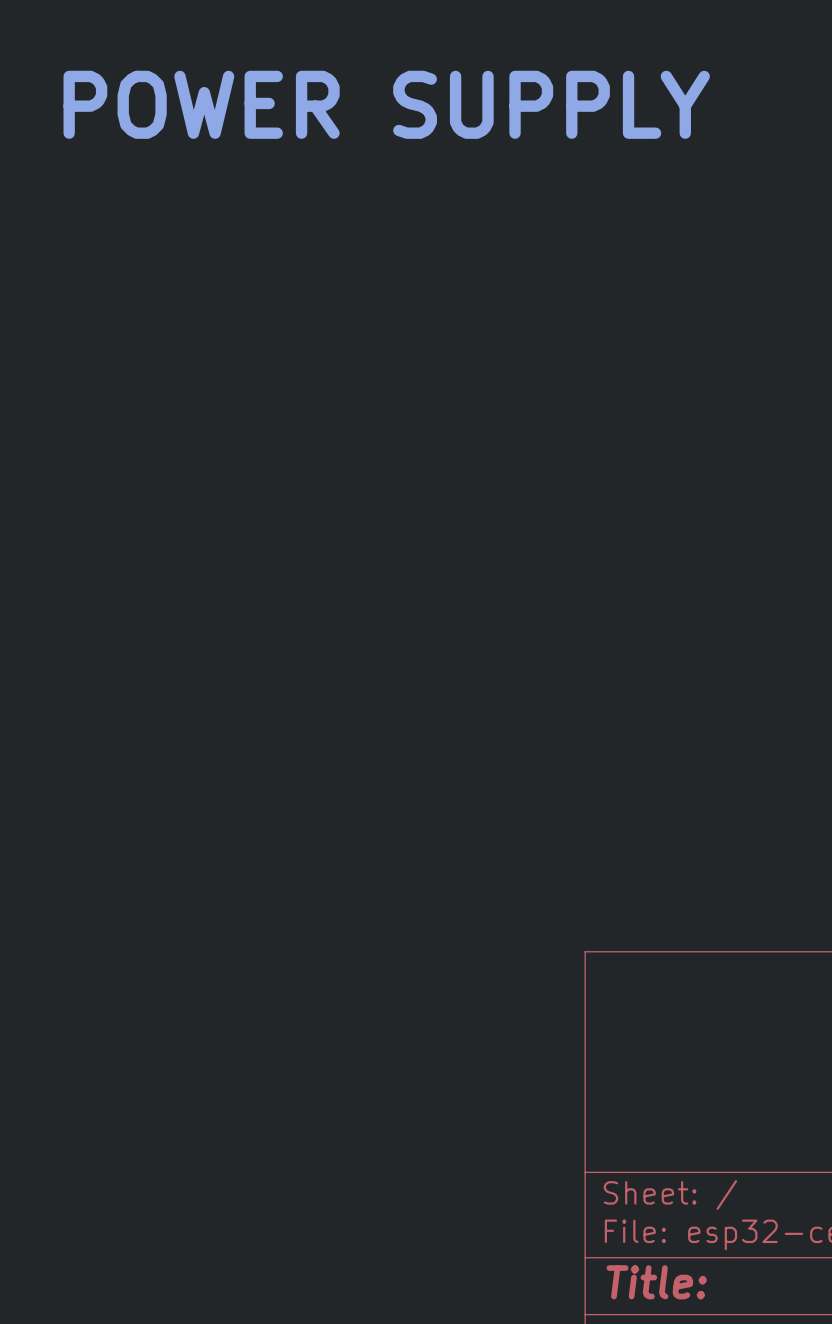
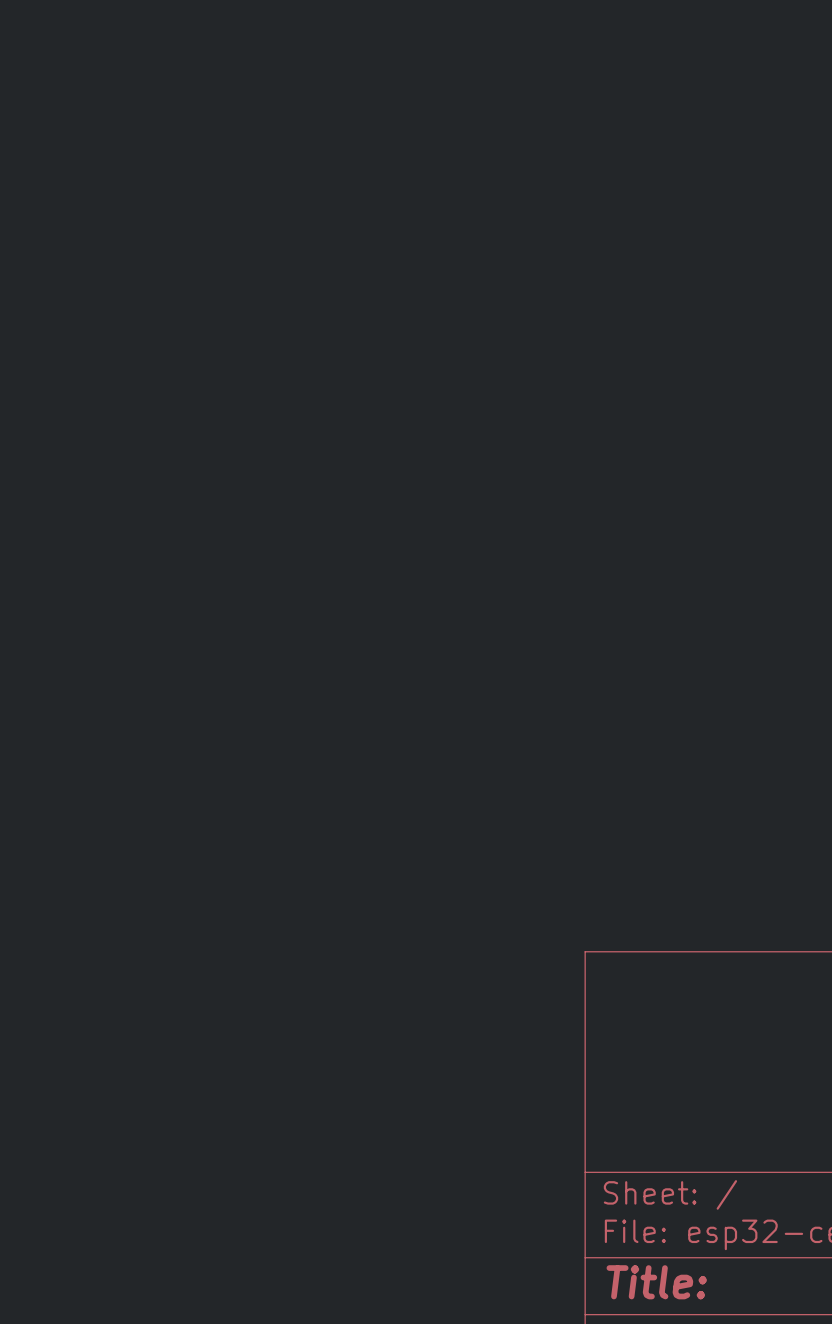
text: POWER SUPPLY (386, 104) -> none

